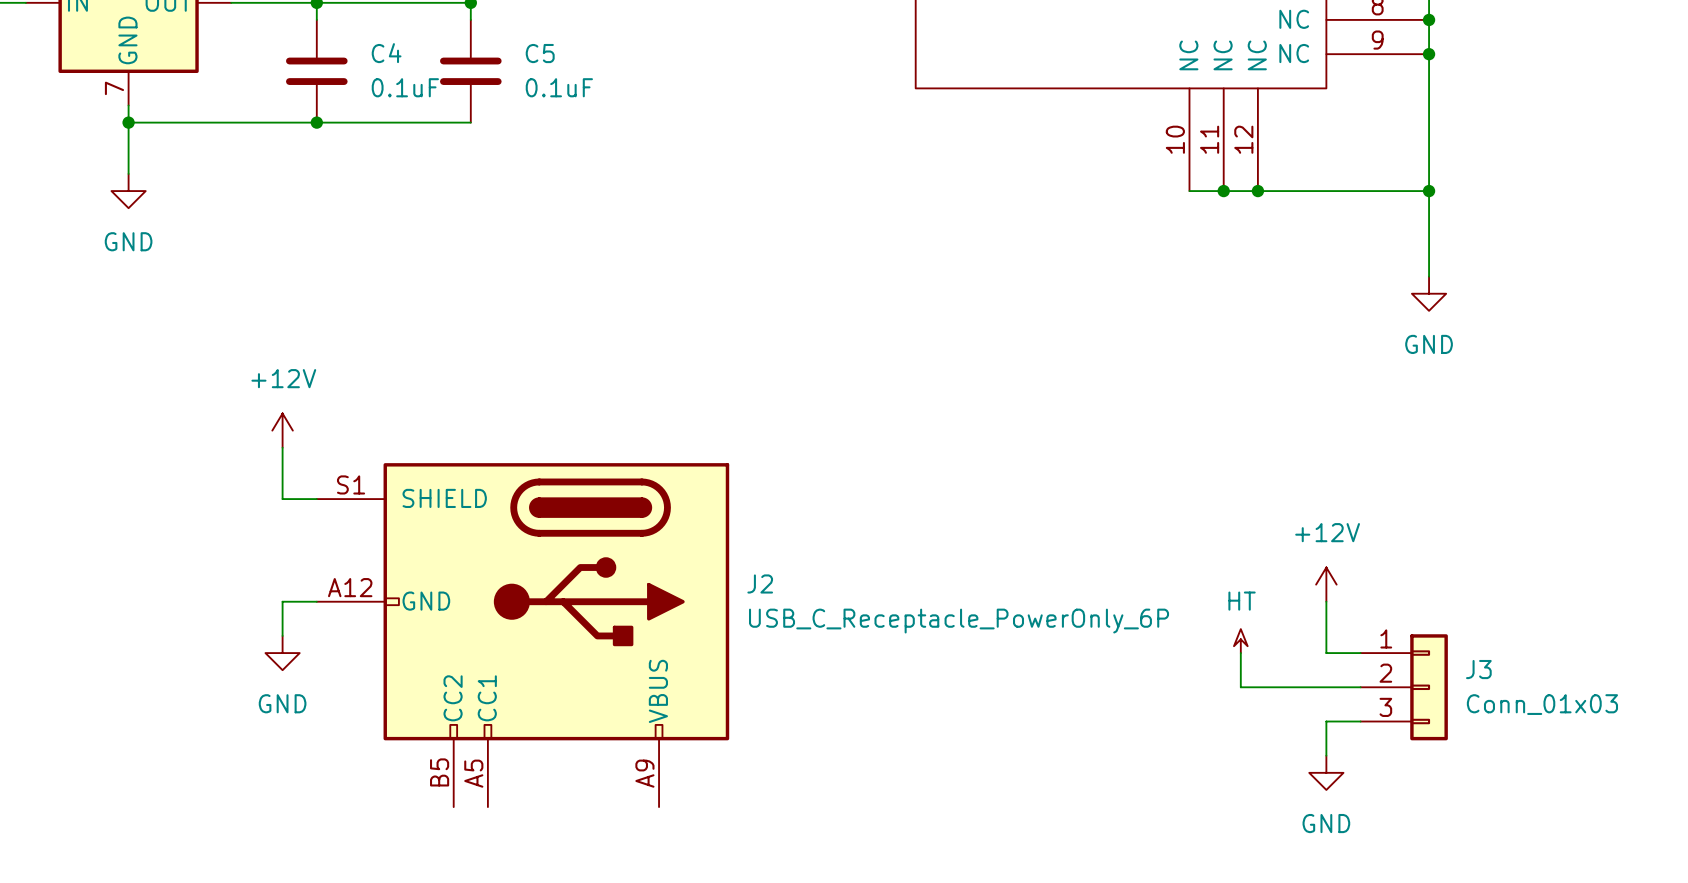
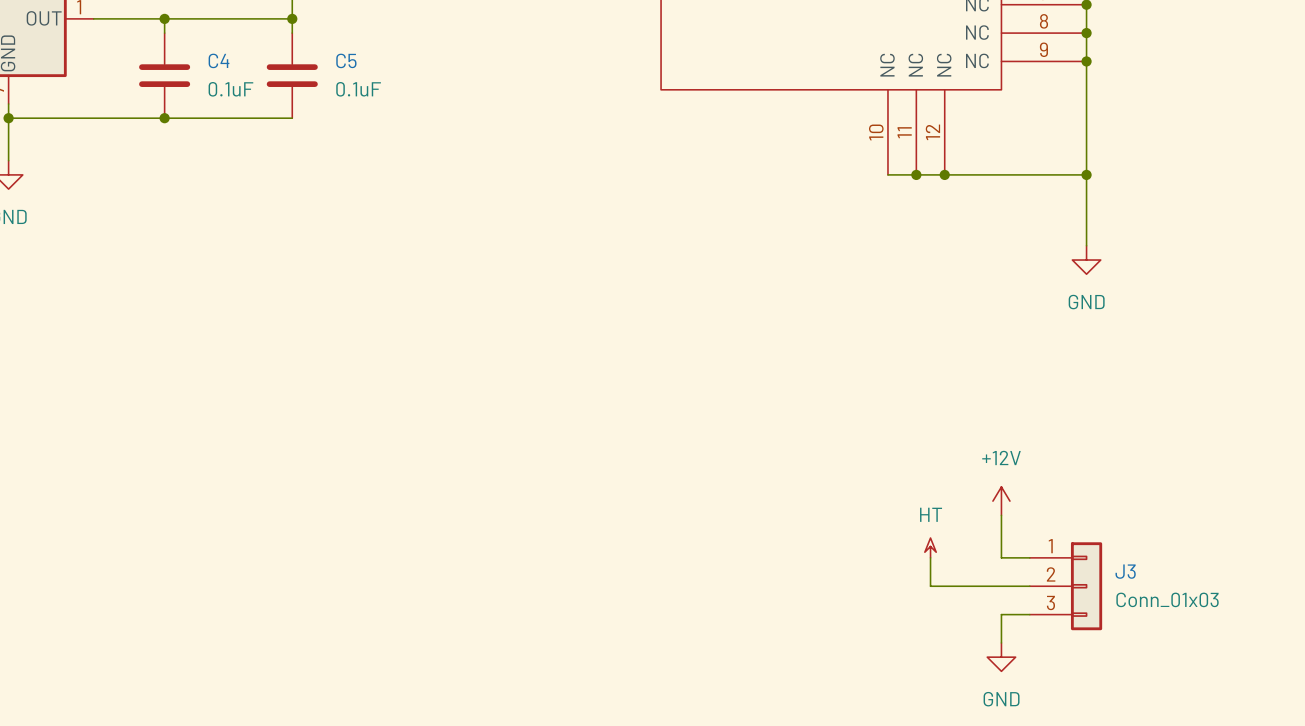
power symbol: +12V (282, 430) -> none
wire: (282, 447) (282, 499) (316, 499) -> none
wire: (316, 601) (282, 601) (282, 635) -> none
J2: USB_C_Receptacle_PowerOnly_6P (523, 635) -> none
power symbol: GND (282, 653) -> none

